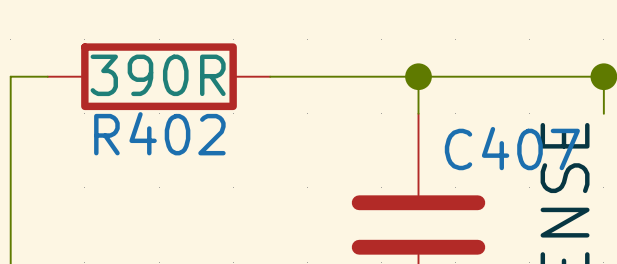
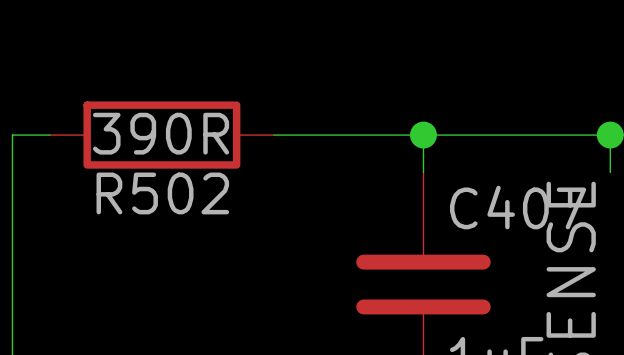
R402 name: R402 (159, 133) -> R502 (162, 193)

